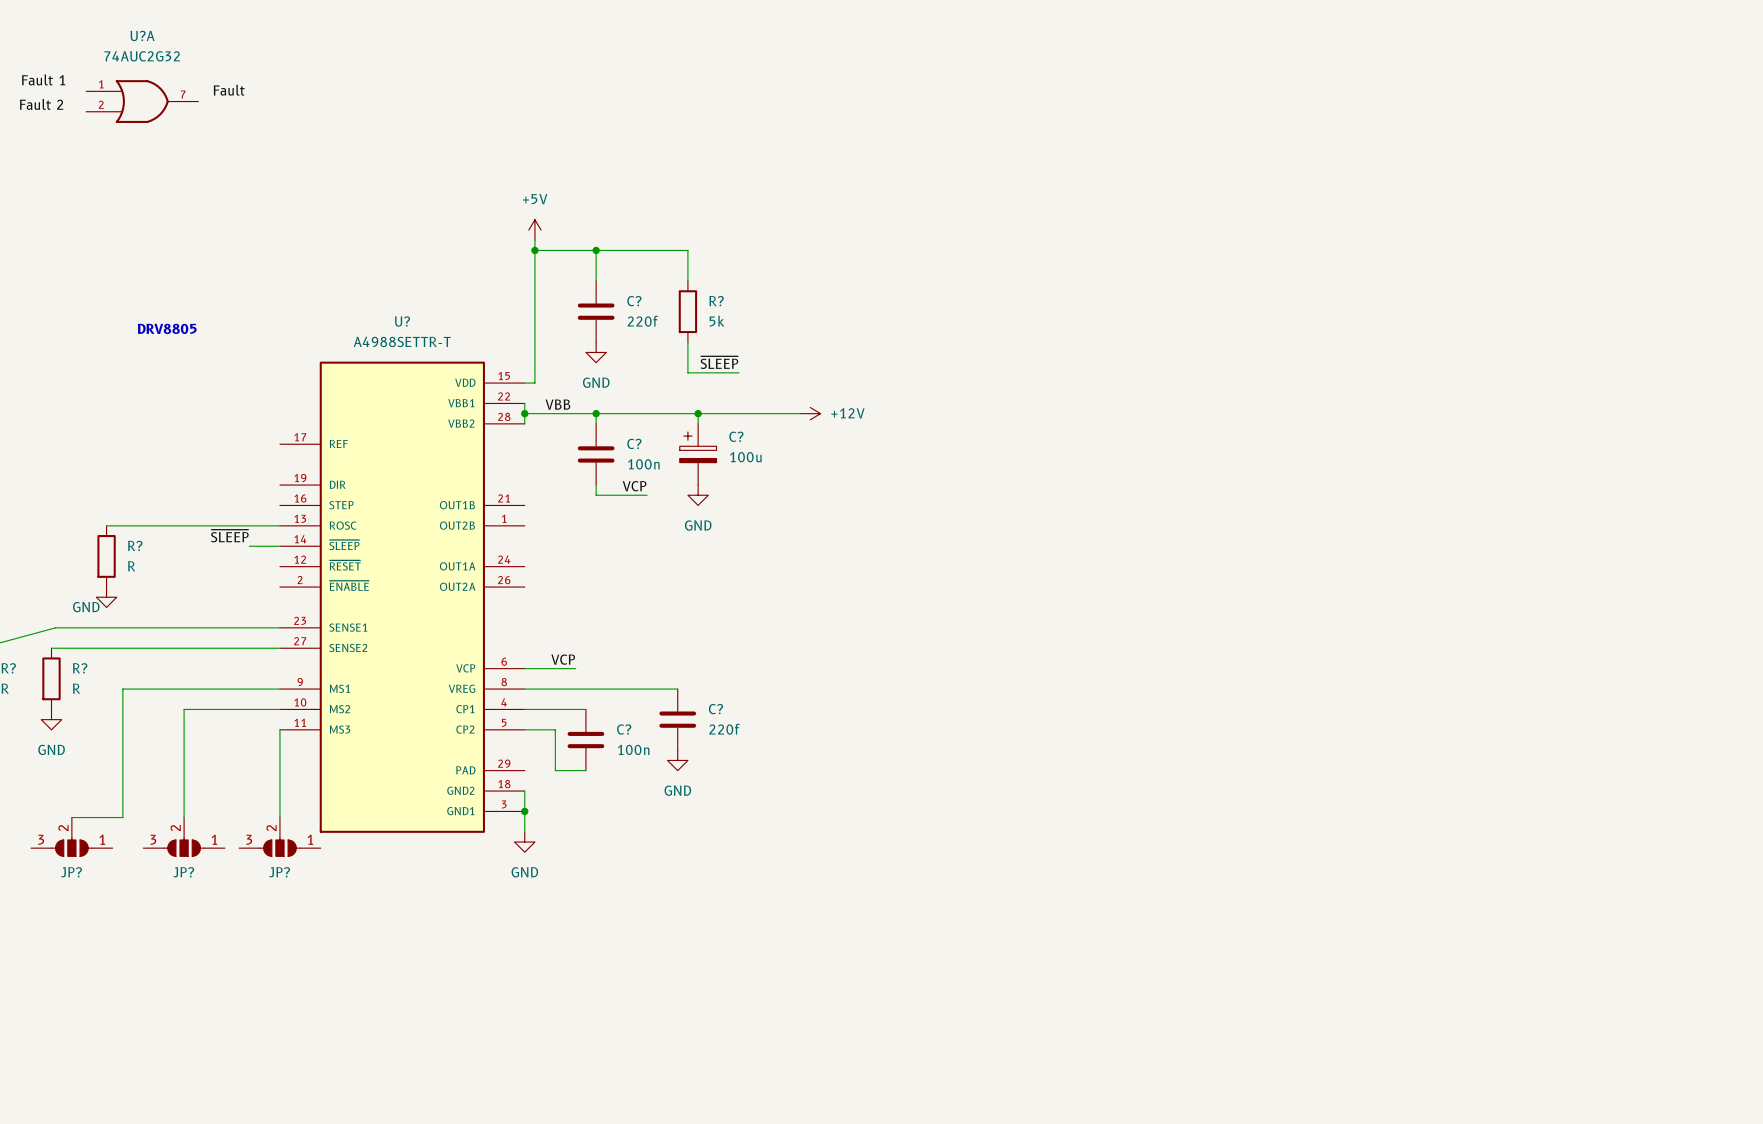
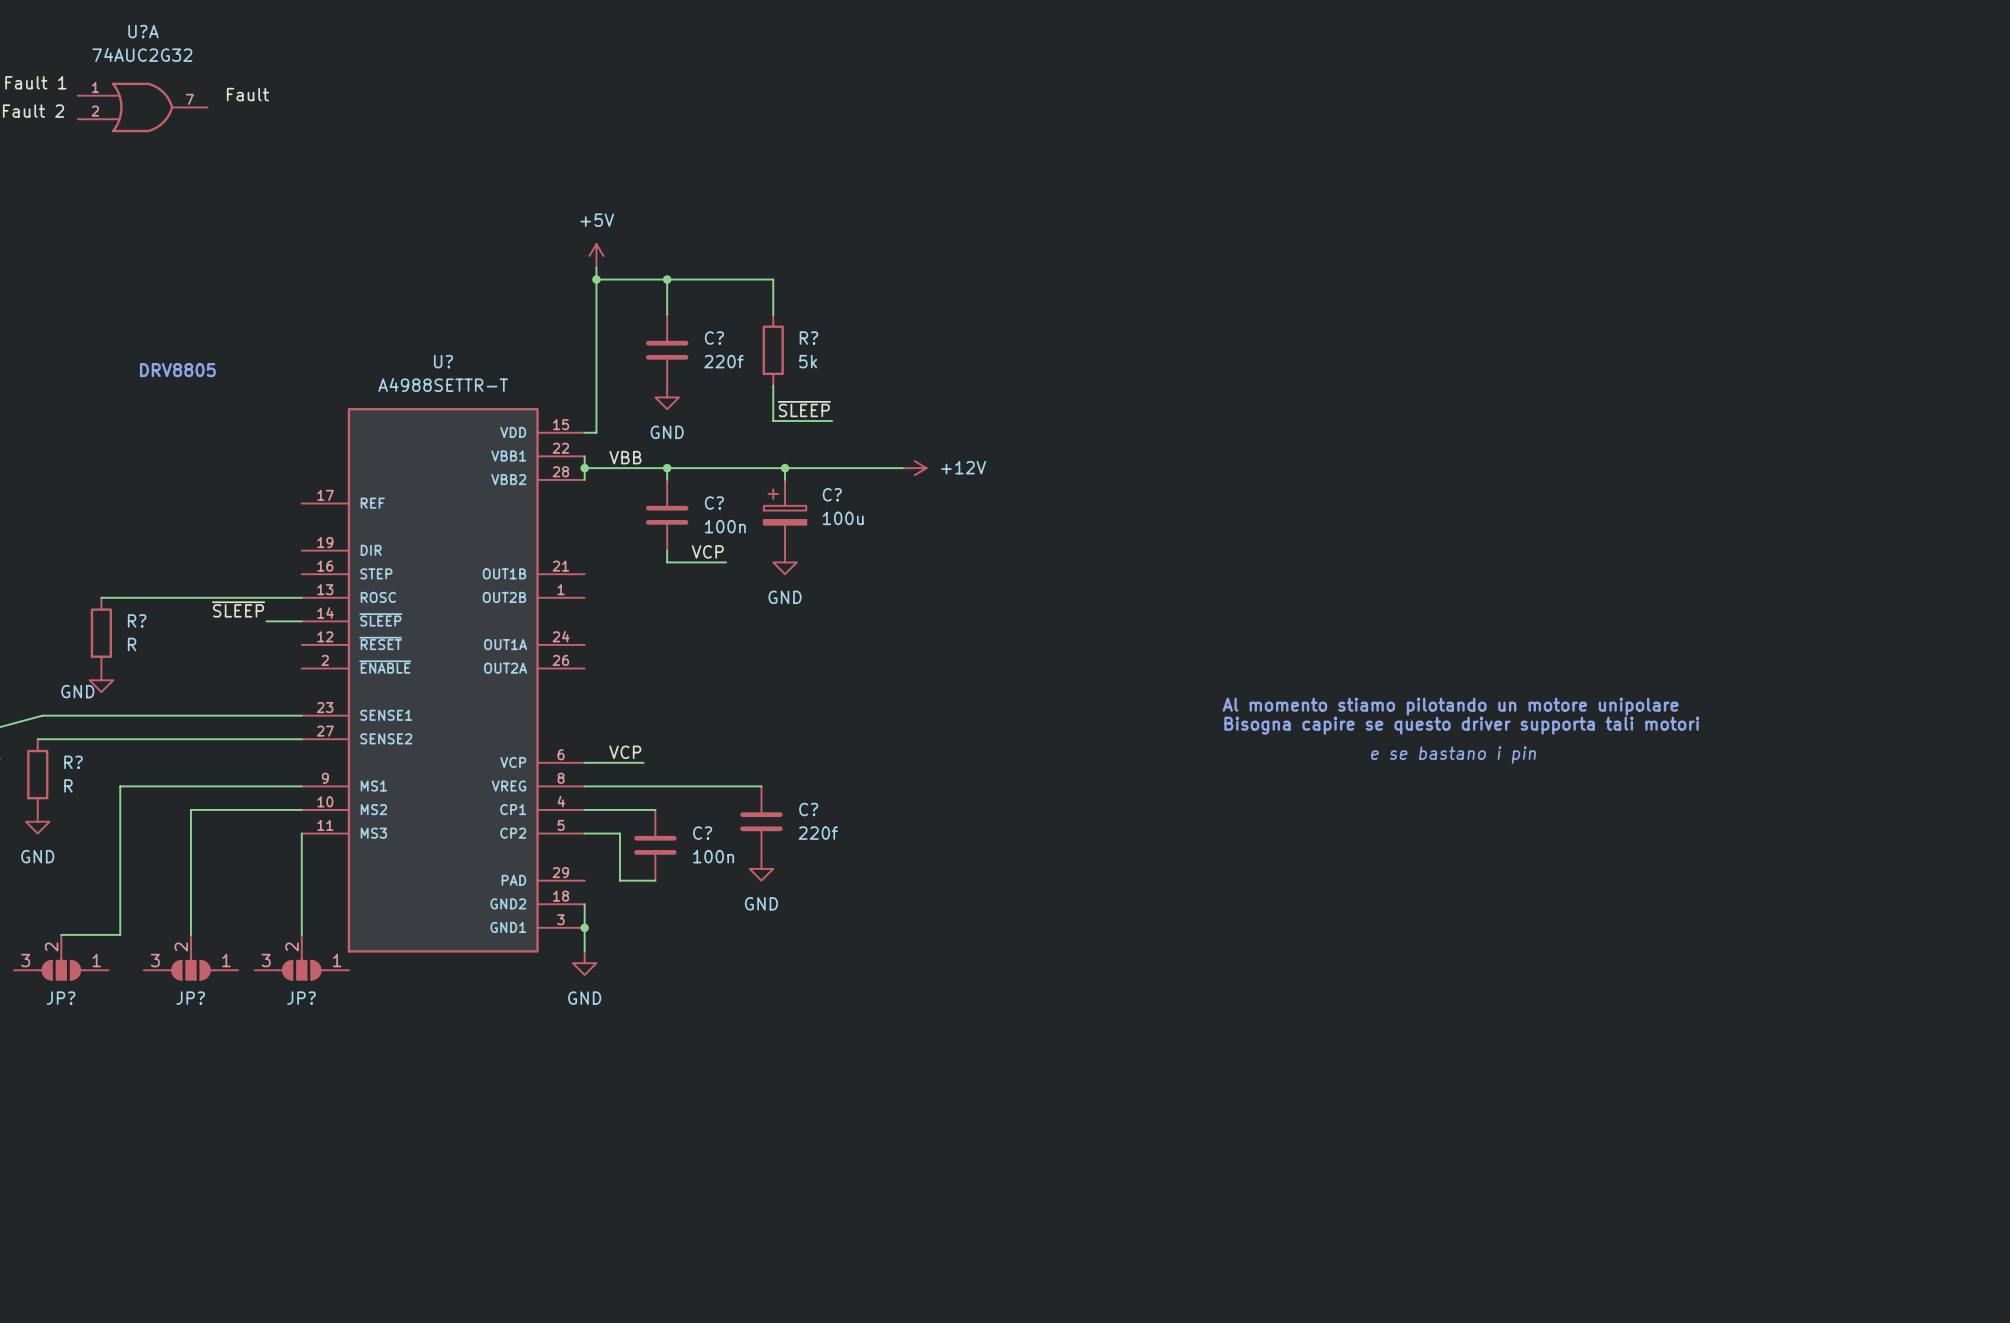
text: none -> Al momento stiamo pilotando un motore unipolare (1450, 706)
text: none -> Bisogna capire se questo driver supporta tali motori (1461, 725)
text: none -> e se bastano i pin (1453, 755)

